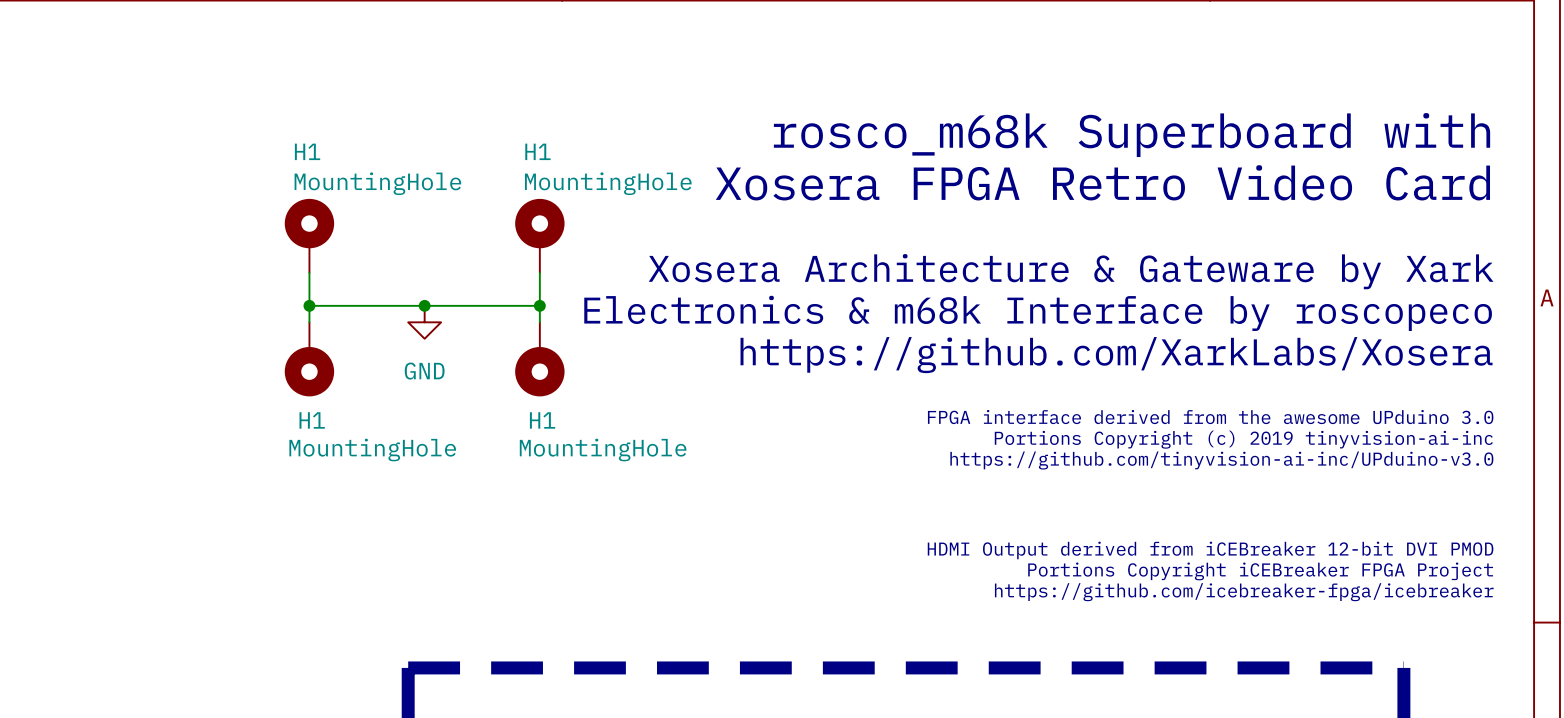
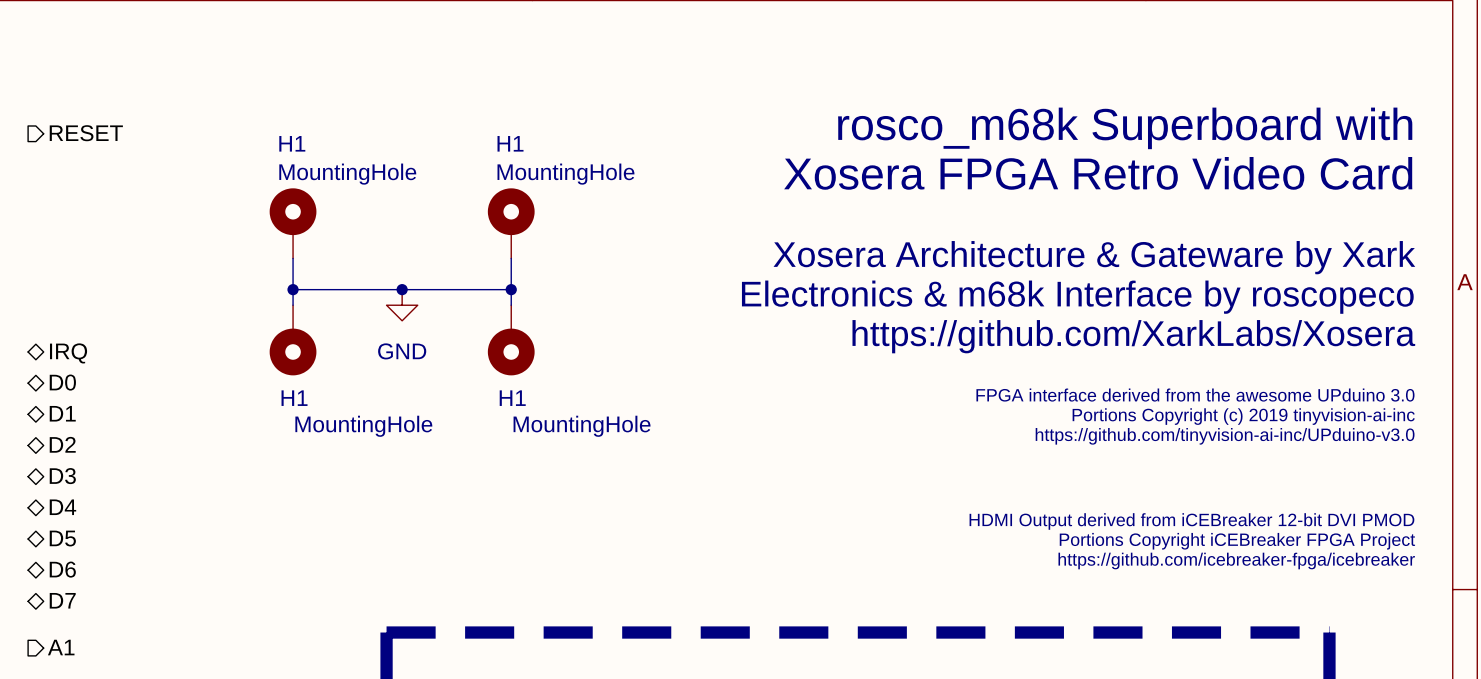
sheet pin: none -> RESET (86, 133)
sheet pin: none -> IRQ (68, 353)
sheet pin: none -> D0 (62, 382)
sheet pin: none -> D1 (62, 413)
sheet pin: none -> D2 (62, 444)
sheet pin: none -> D3 (62, 476)
sheet pin: none -> D4 (62, 507)
sheet pin: none -> D5 (62, 538)
sheet pin: none -> D6 (62, 569)
sheet pin: none -> D7 (62, 600)
sheet pin: none -> A1 (61, 647)

